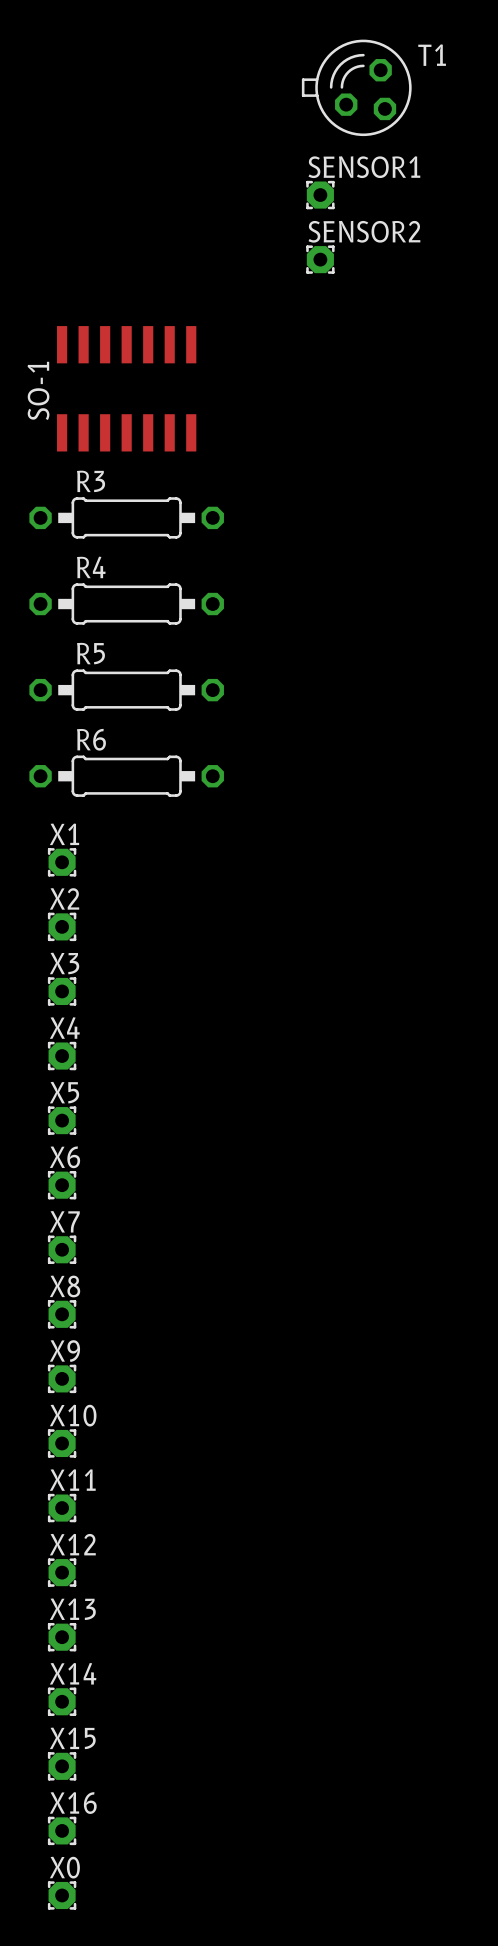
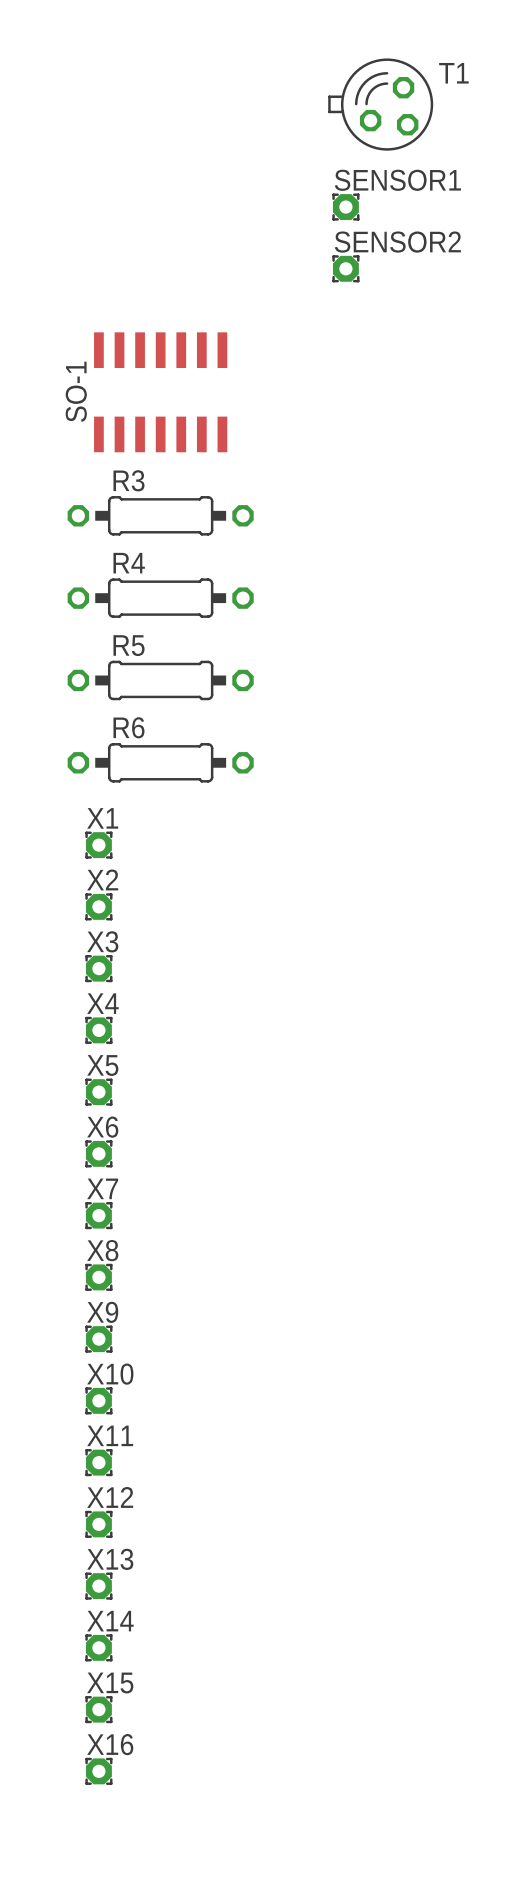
X0: (62, 1895) -> none

